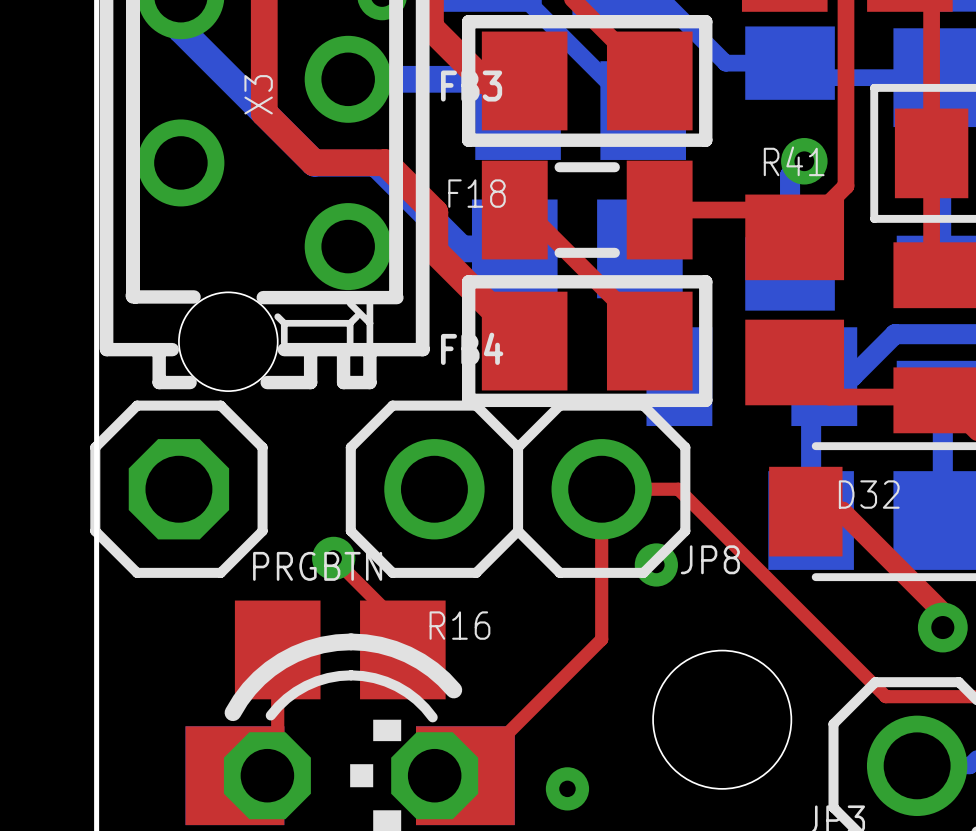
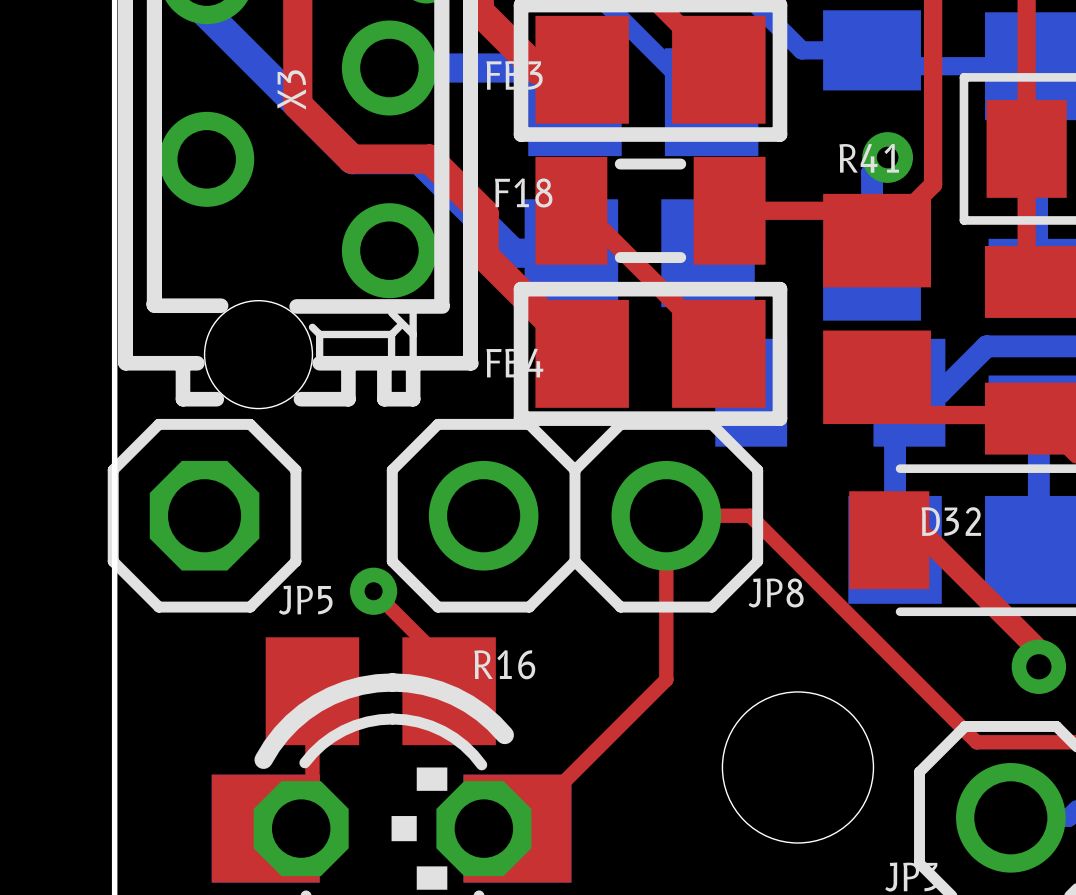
via: (656, 564) -> none
PRGBTN name: PRGBTN (317, 566) -> JP5 (305, 600)
via: (567, 788) -> none

